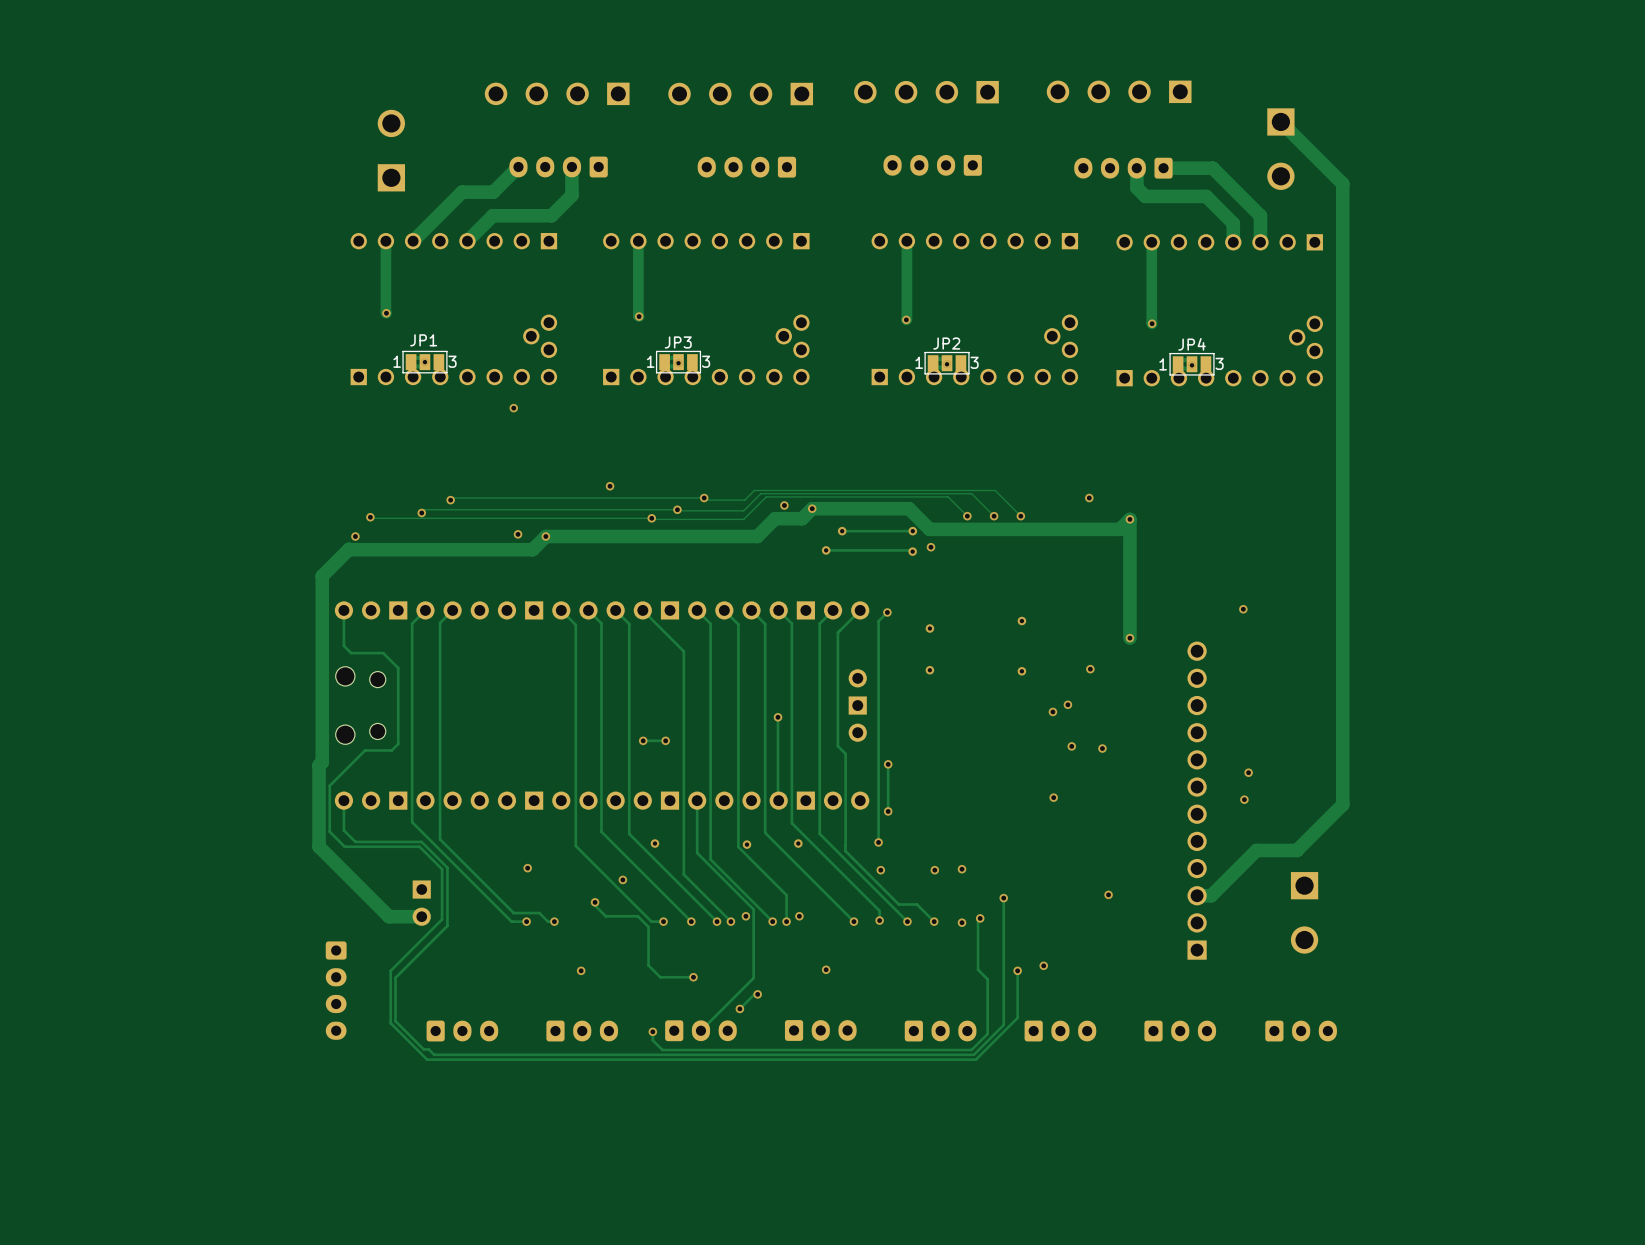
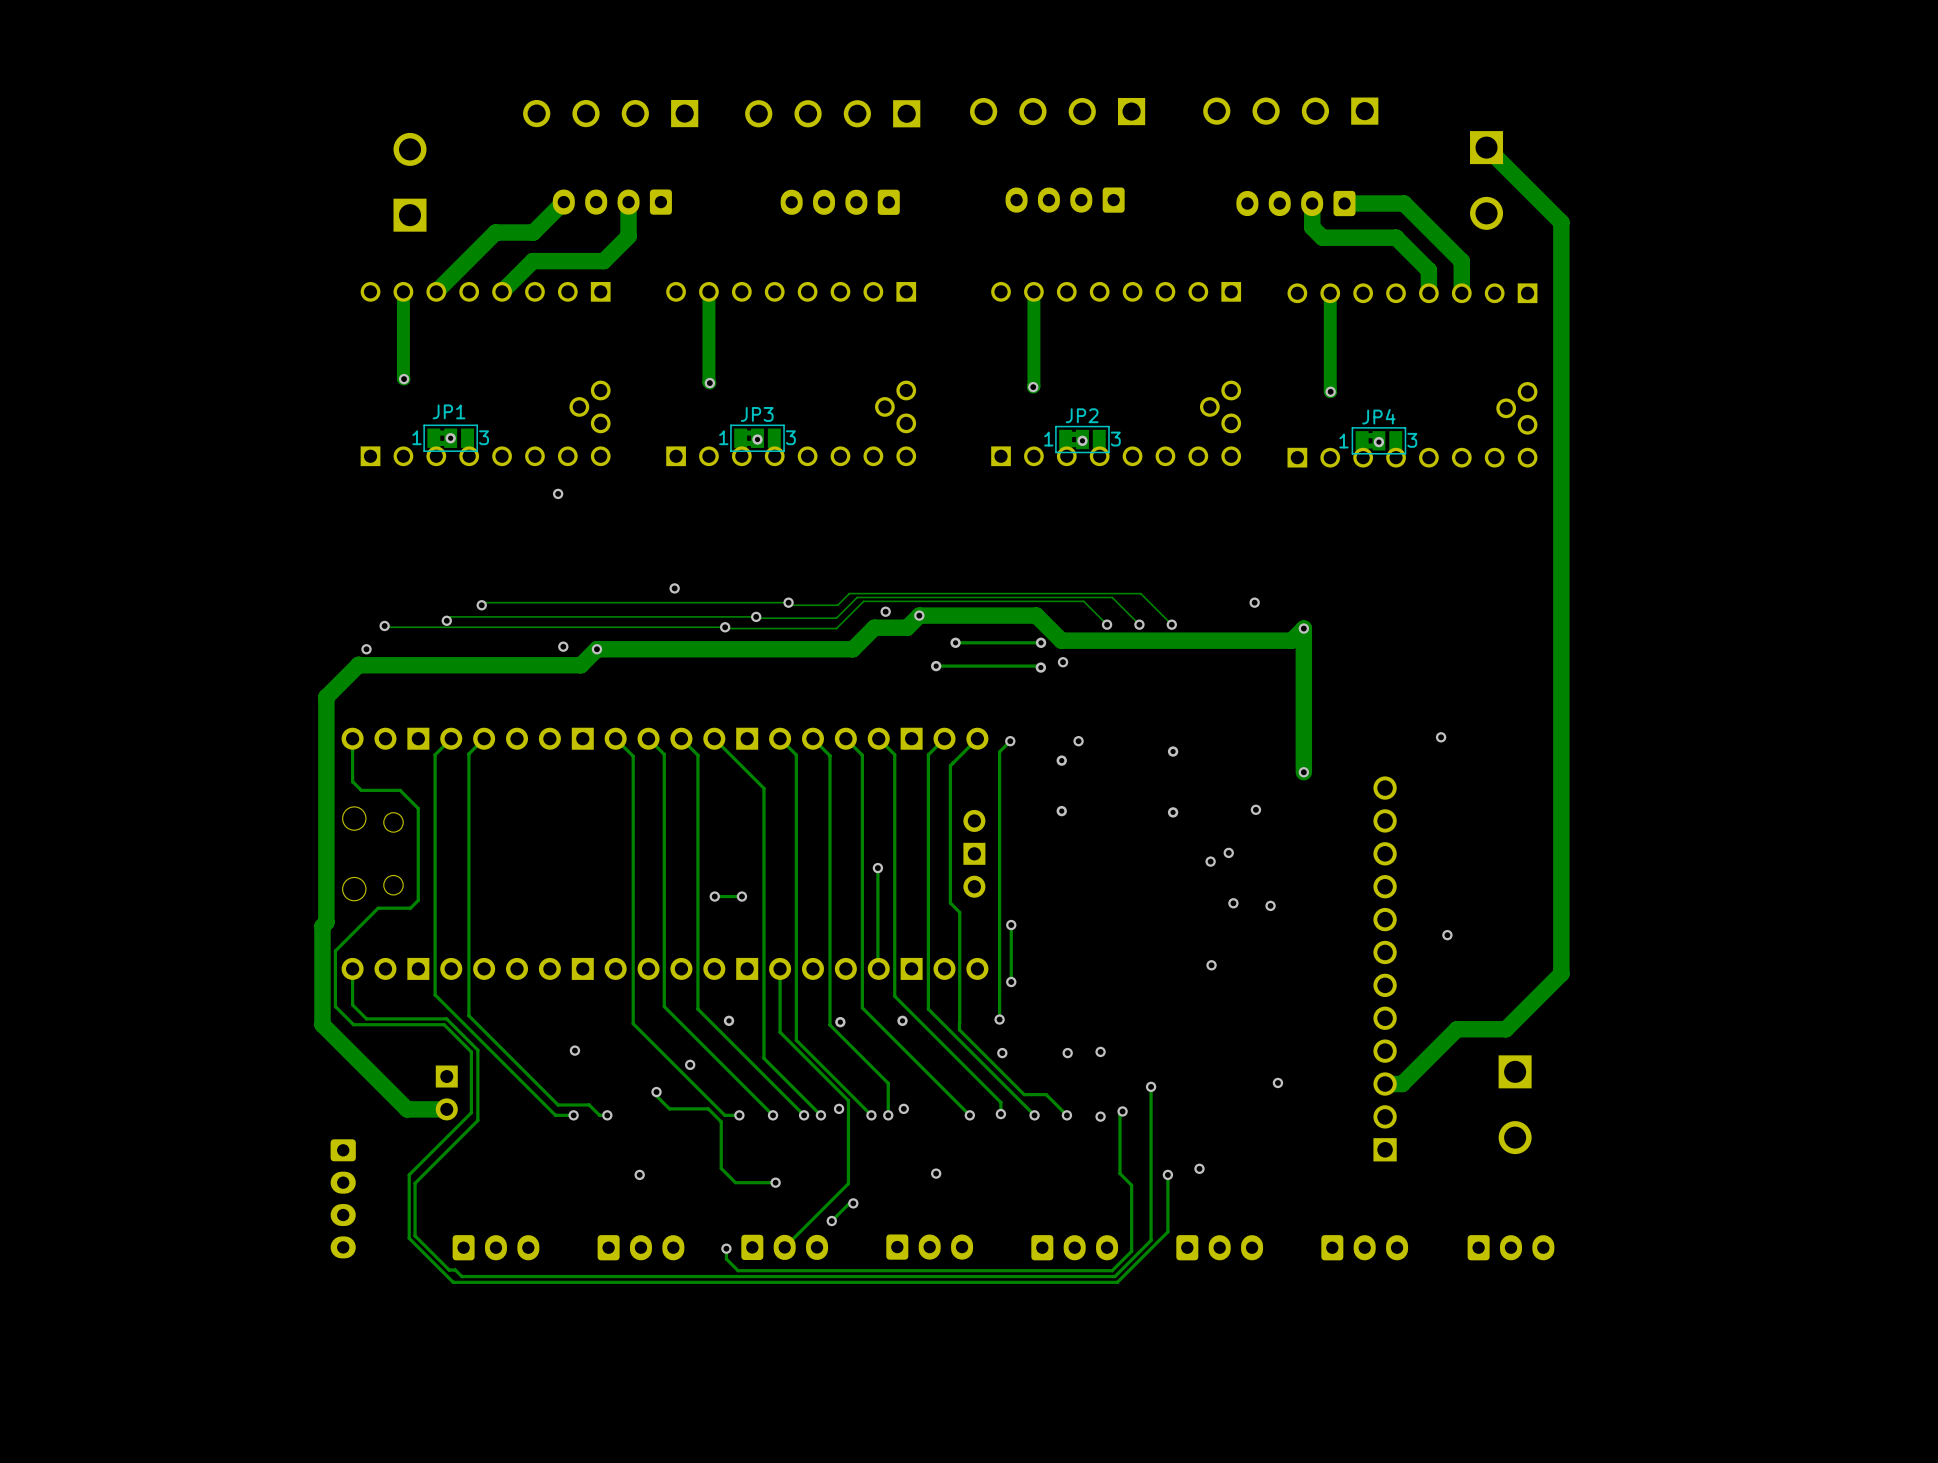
via: none -> (1078, 741)
via: (1244, 799) -> none

